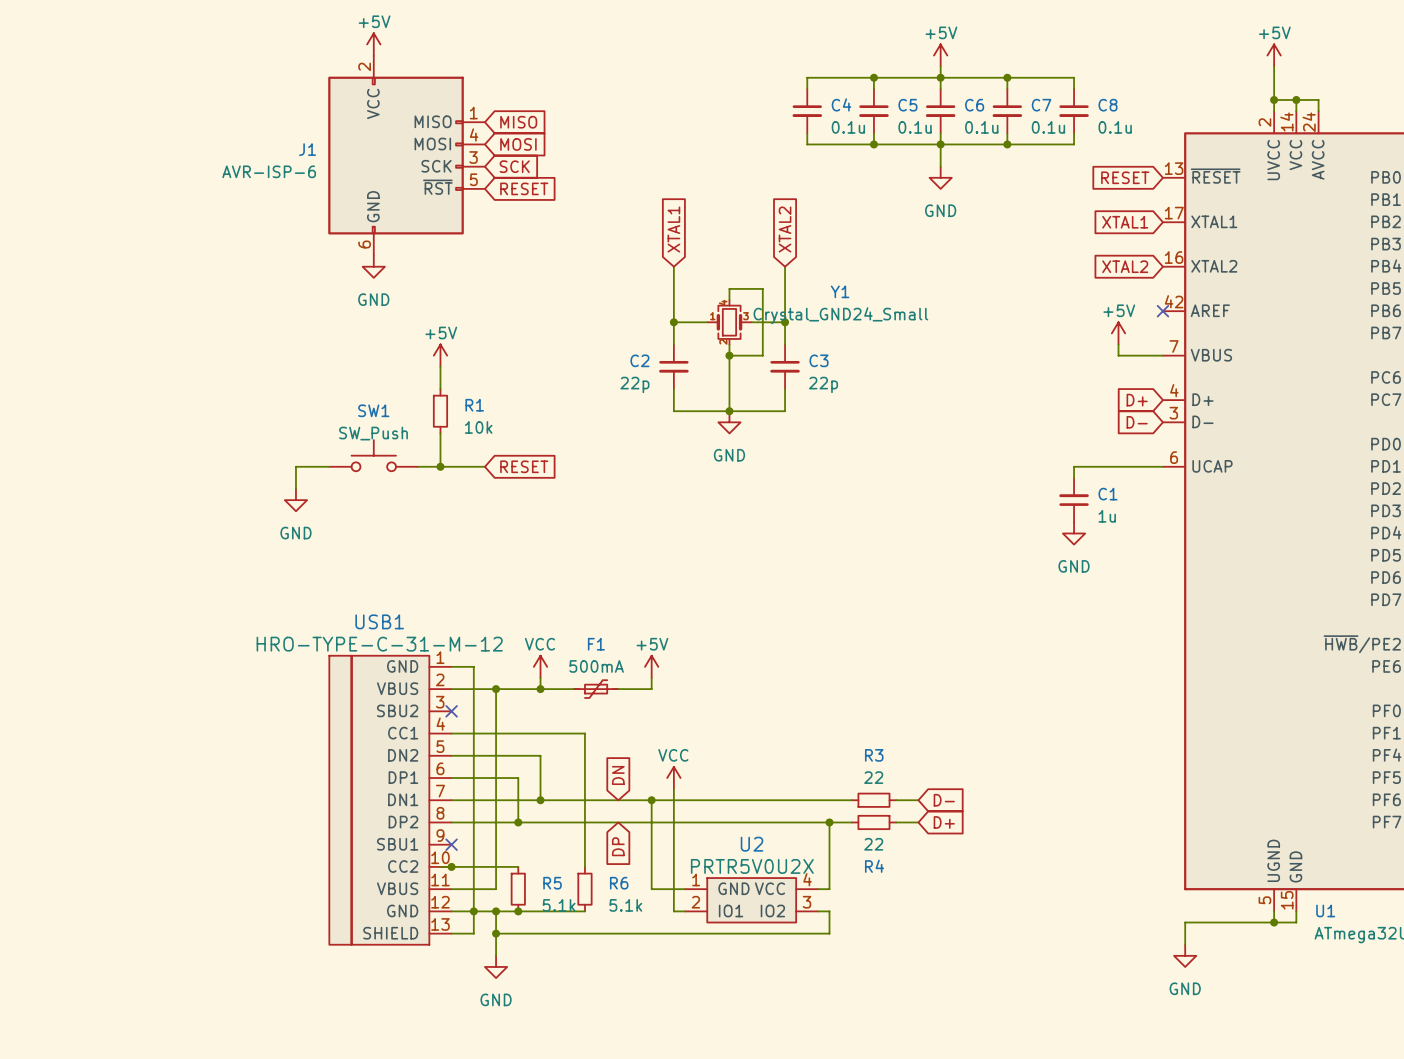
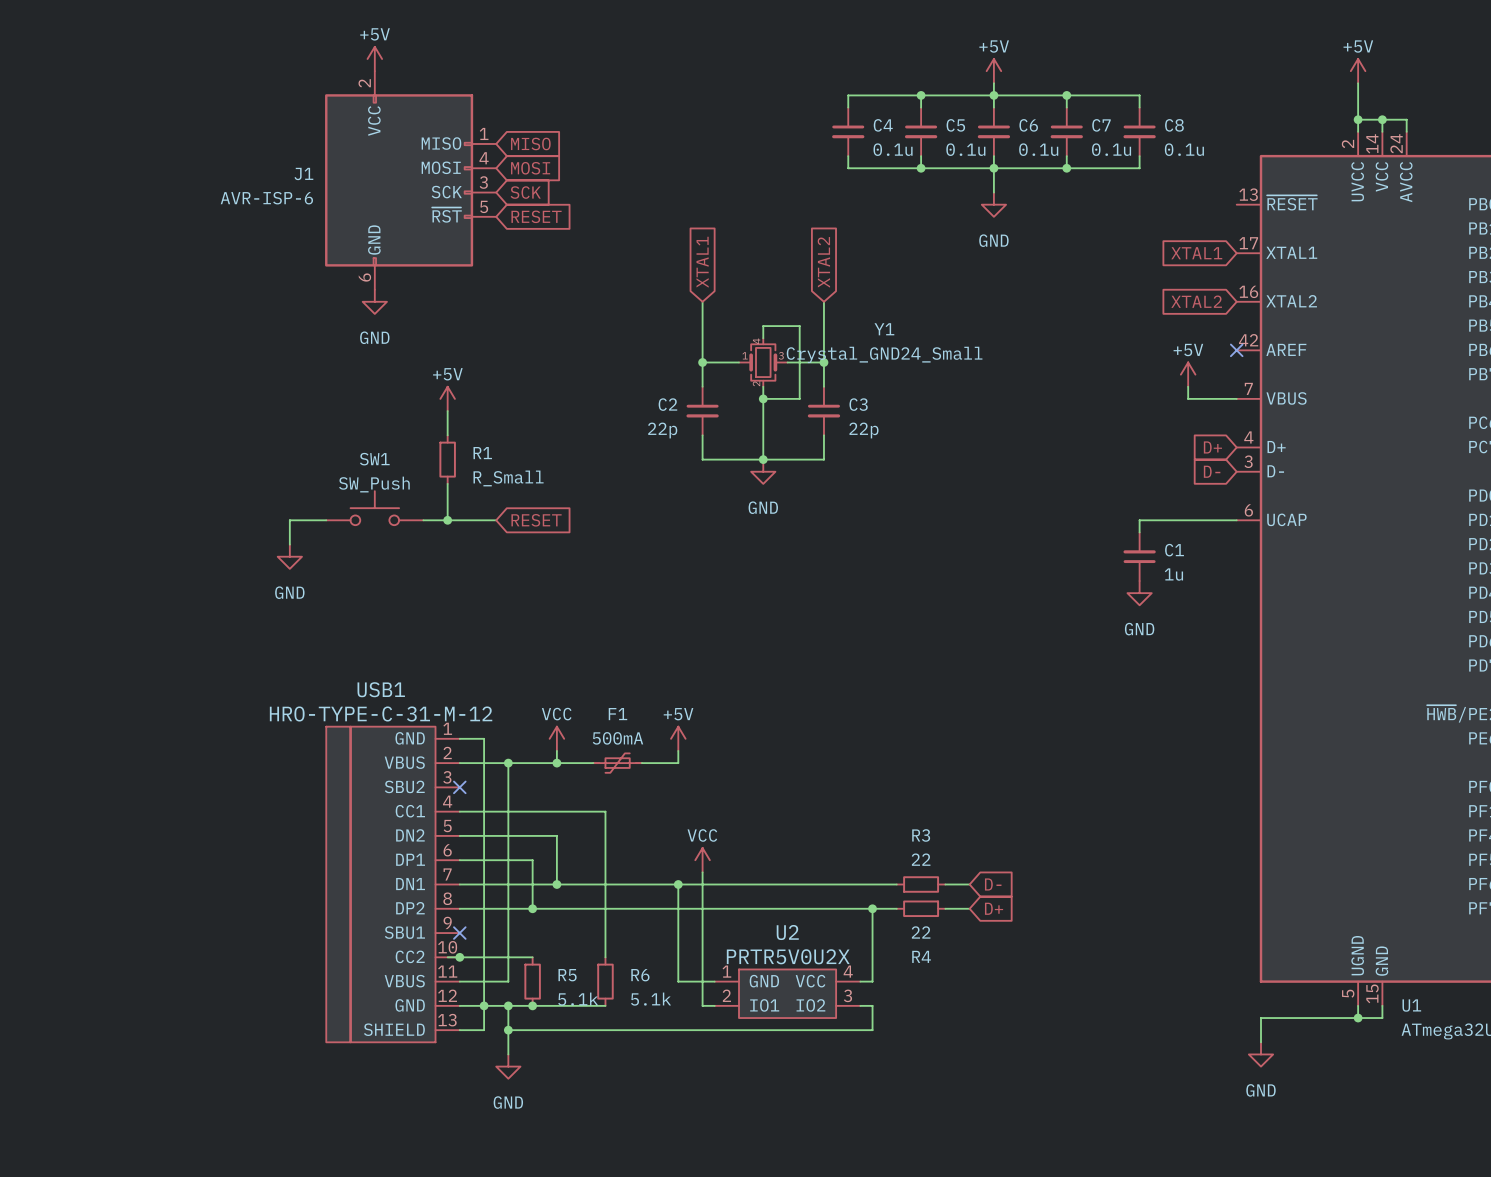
global label: RESET (1125, 177) -> none
R1 value: 10k (478, 427) -> R_Small (508, 478)
global label: DN (618, 775) -> none
global label: DP (618, 846) -> none

